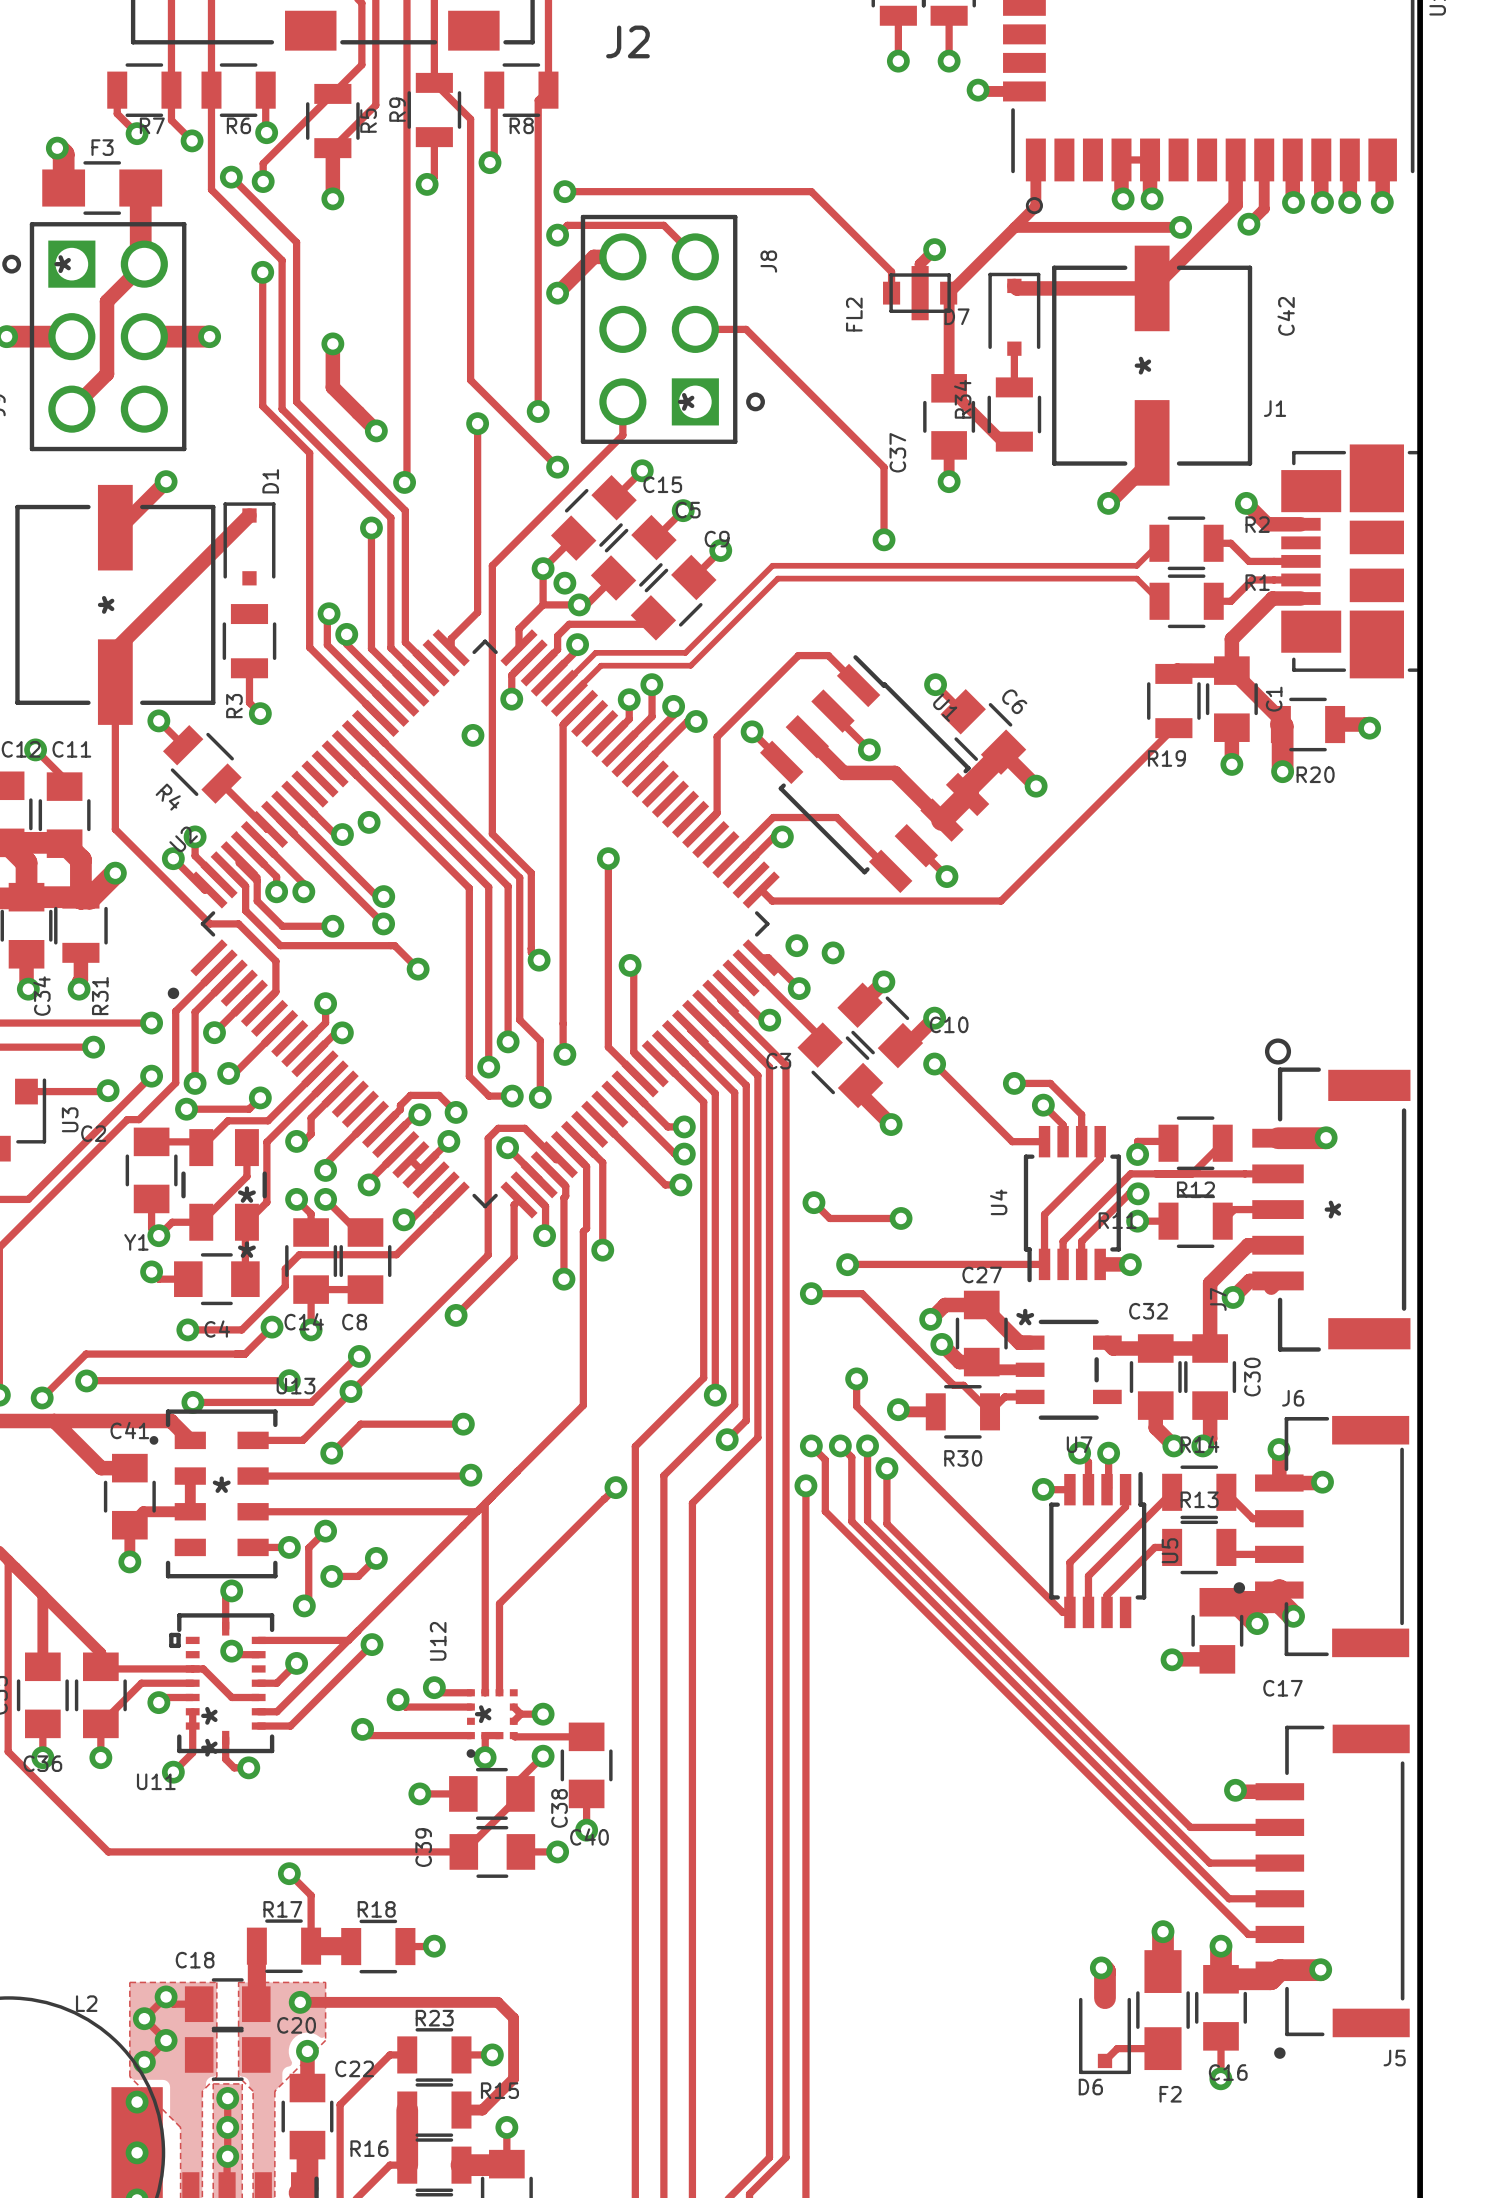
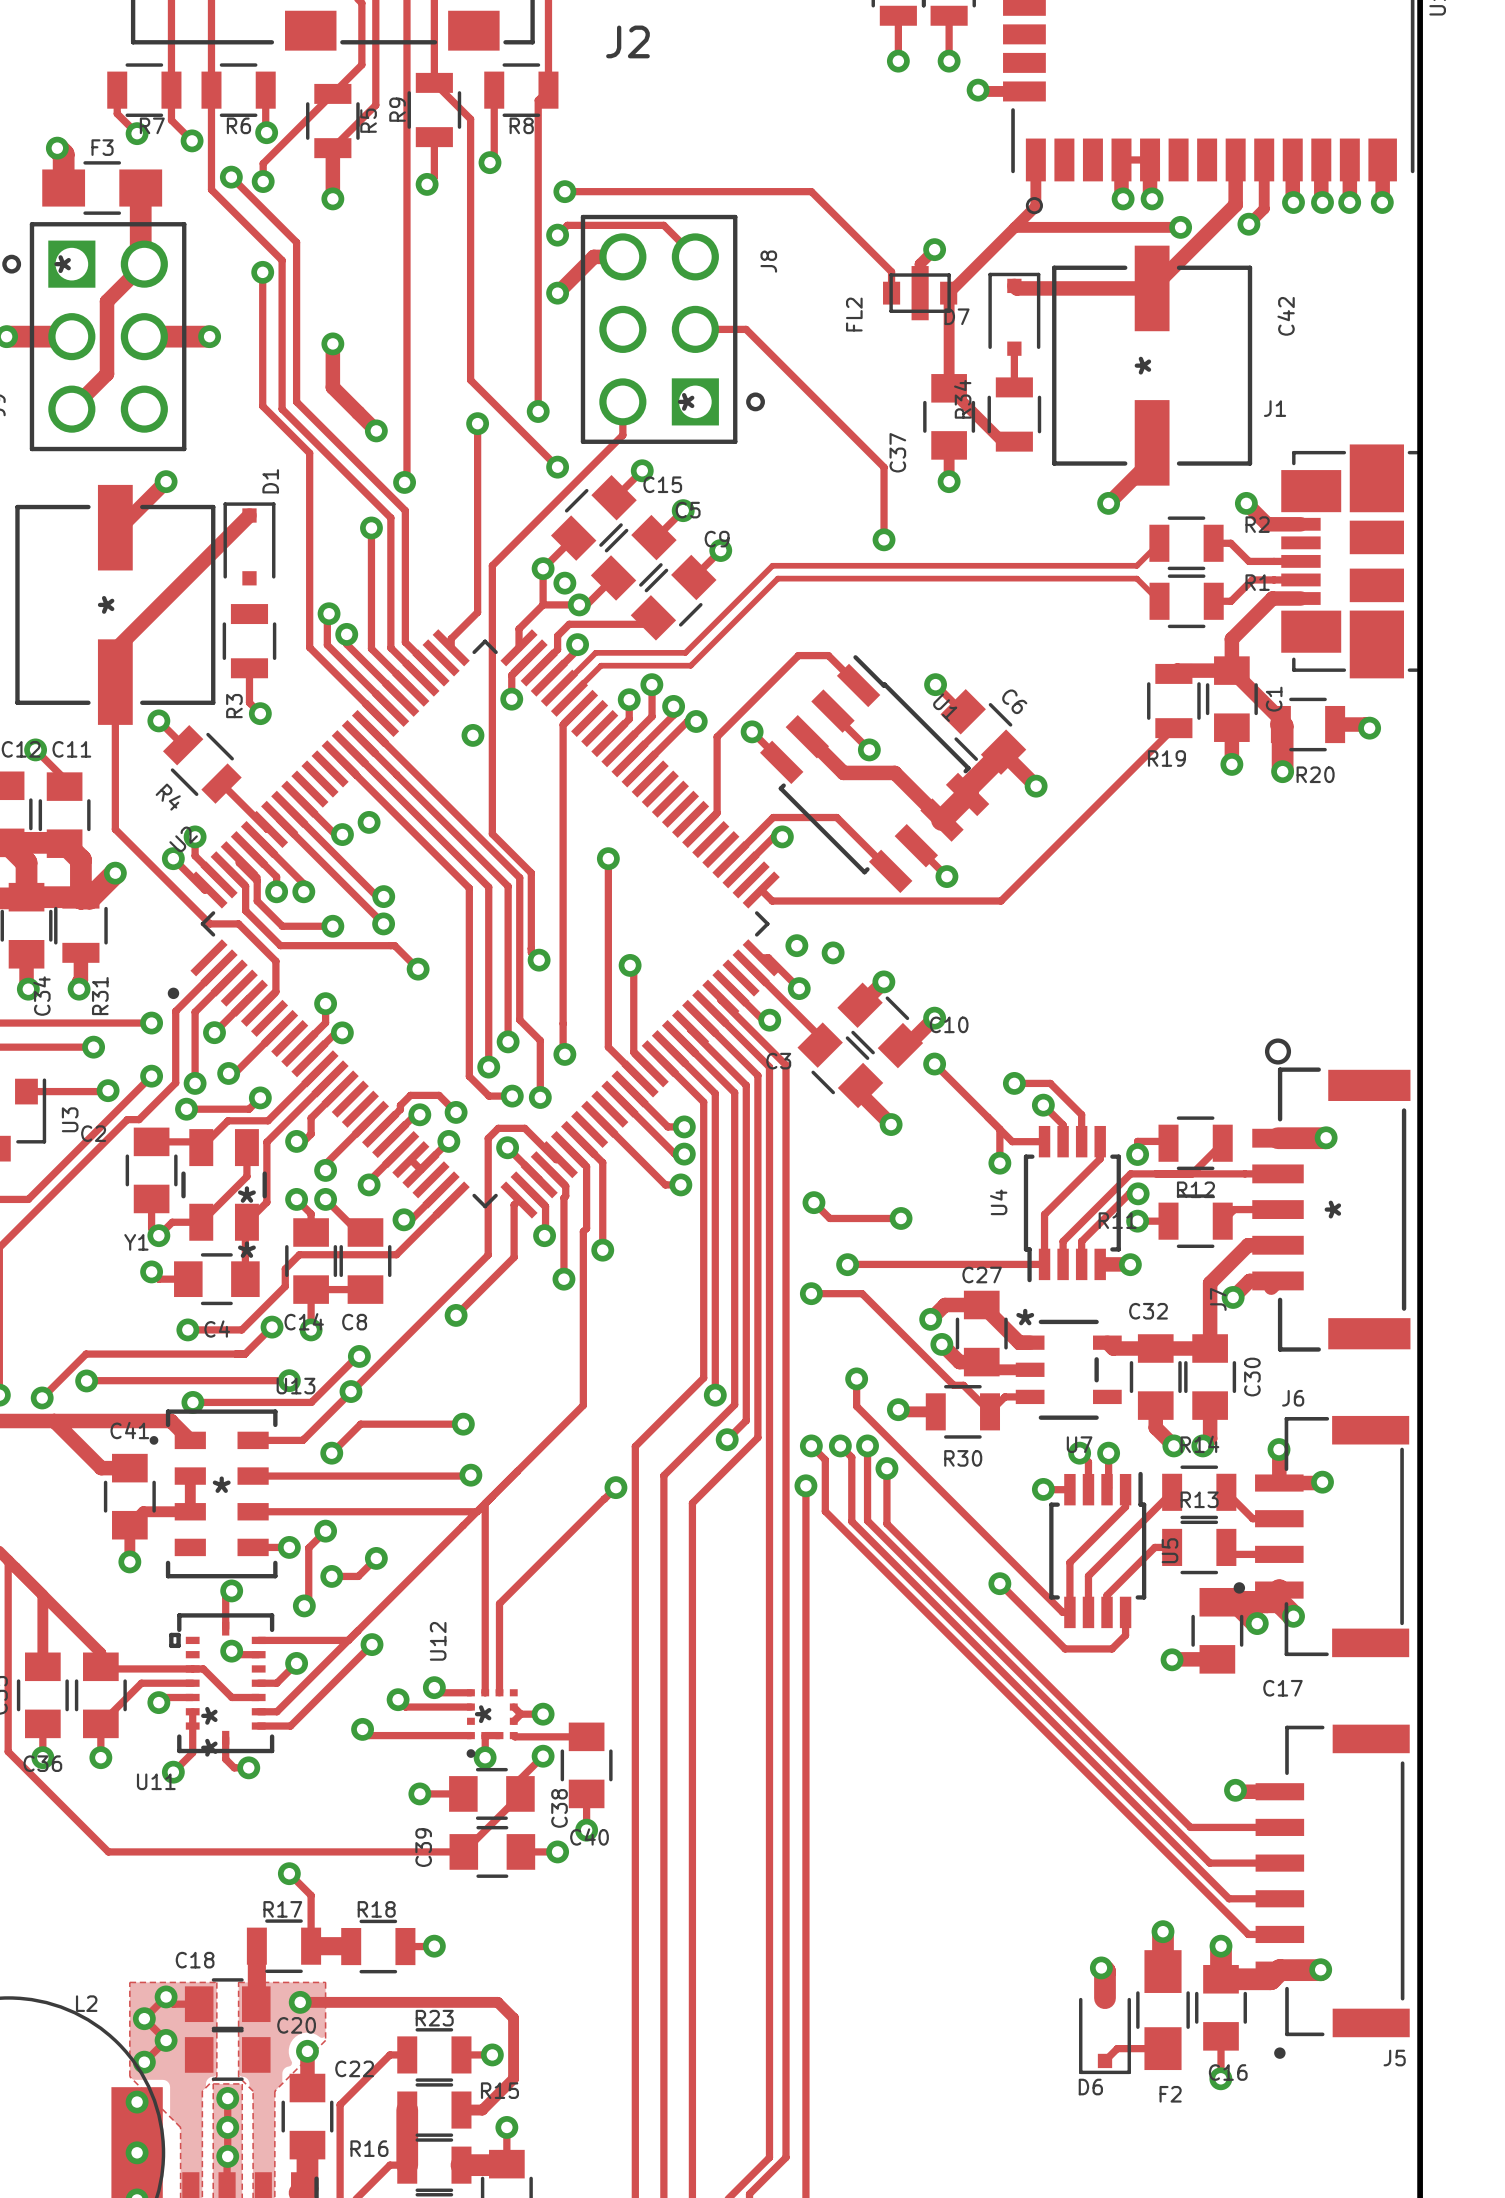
track: none -> (999, 1129) (999, 1163)
via: none -> (999, 1163)
track: none -> (999, 1583) (1065, 1648) (1112, 1648) (1125, 1635) (1125, 1612)
via: none -> (999, 1583)

